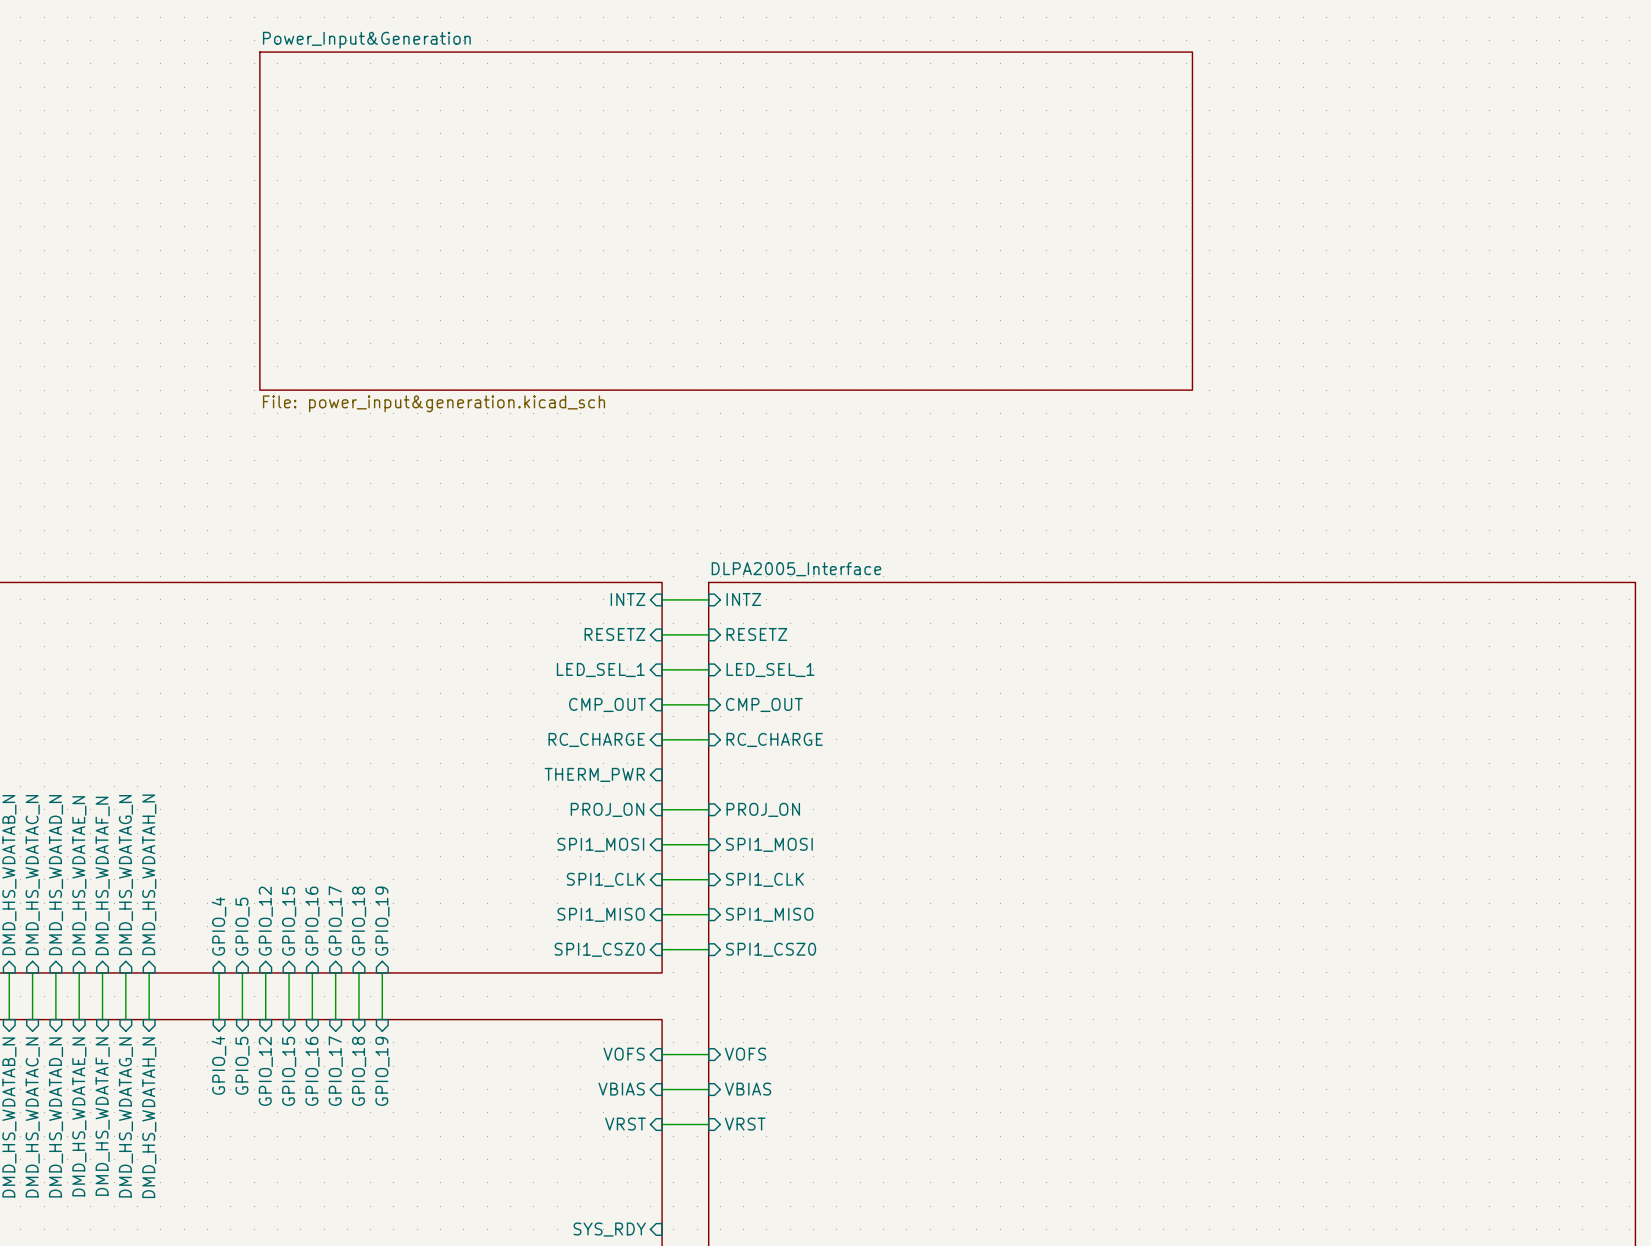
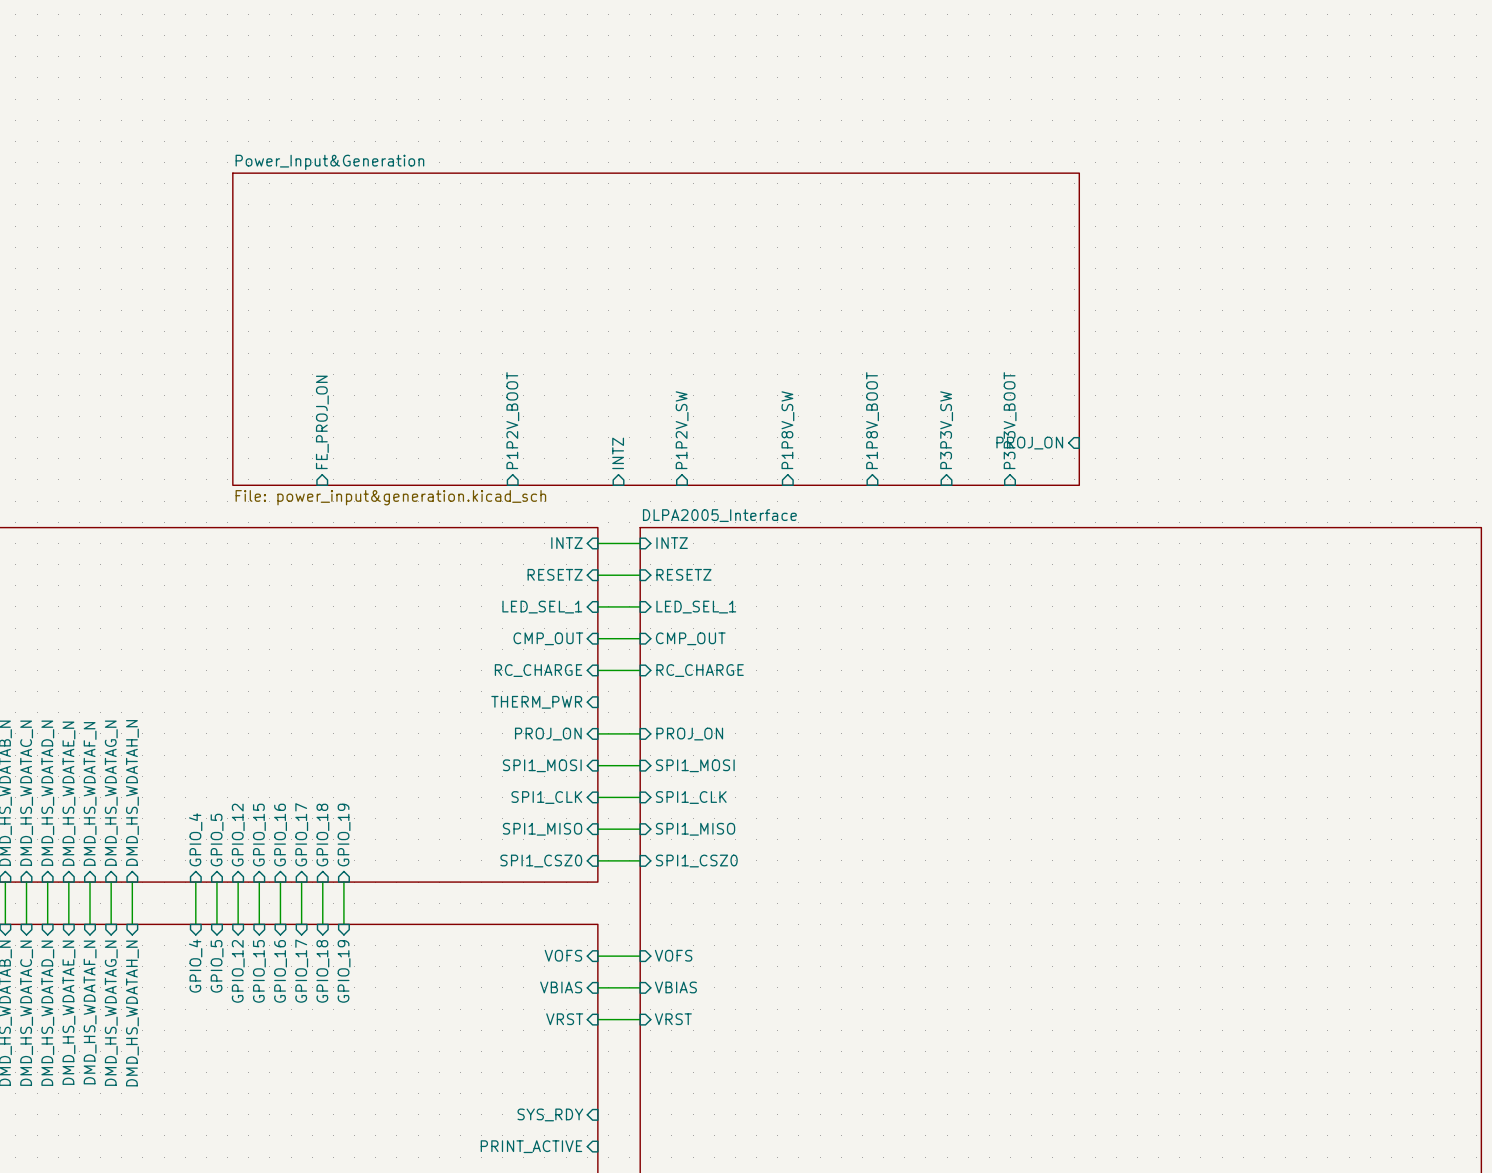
sheet Power_Input&Generation: File: power_input&generation.kicad_sch (726, 221) -> none
sheet Power_Input&Generation: none -> File: power_input&generation.kicad_sch (656, 329)
sheet pin: none -> P1P2V_BOOT (512, 420)
sheet pin: none -> P1P8V_BOOT (872, 420)
sheet pin: none -> P3P3V_BOOT (1010, 420)
sheet pin: none -> FE_PROJ_ON (322, 422)
sheet pin: none -> P1P2V_SW (682, 430)
sheet pin: none -> P1P8V_SW (787, 430)
sheet pin: none -> P3P3V_SW (946, 430)
sheet pin: none -> PROJ_ON (1029, 443)
sheet pin: none -> INTZ (618, 453)

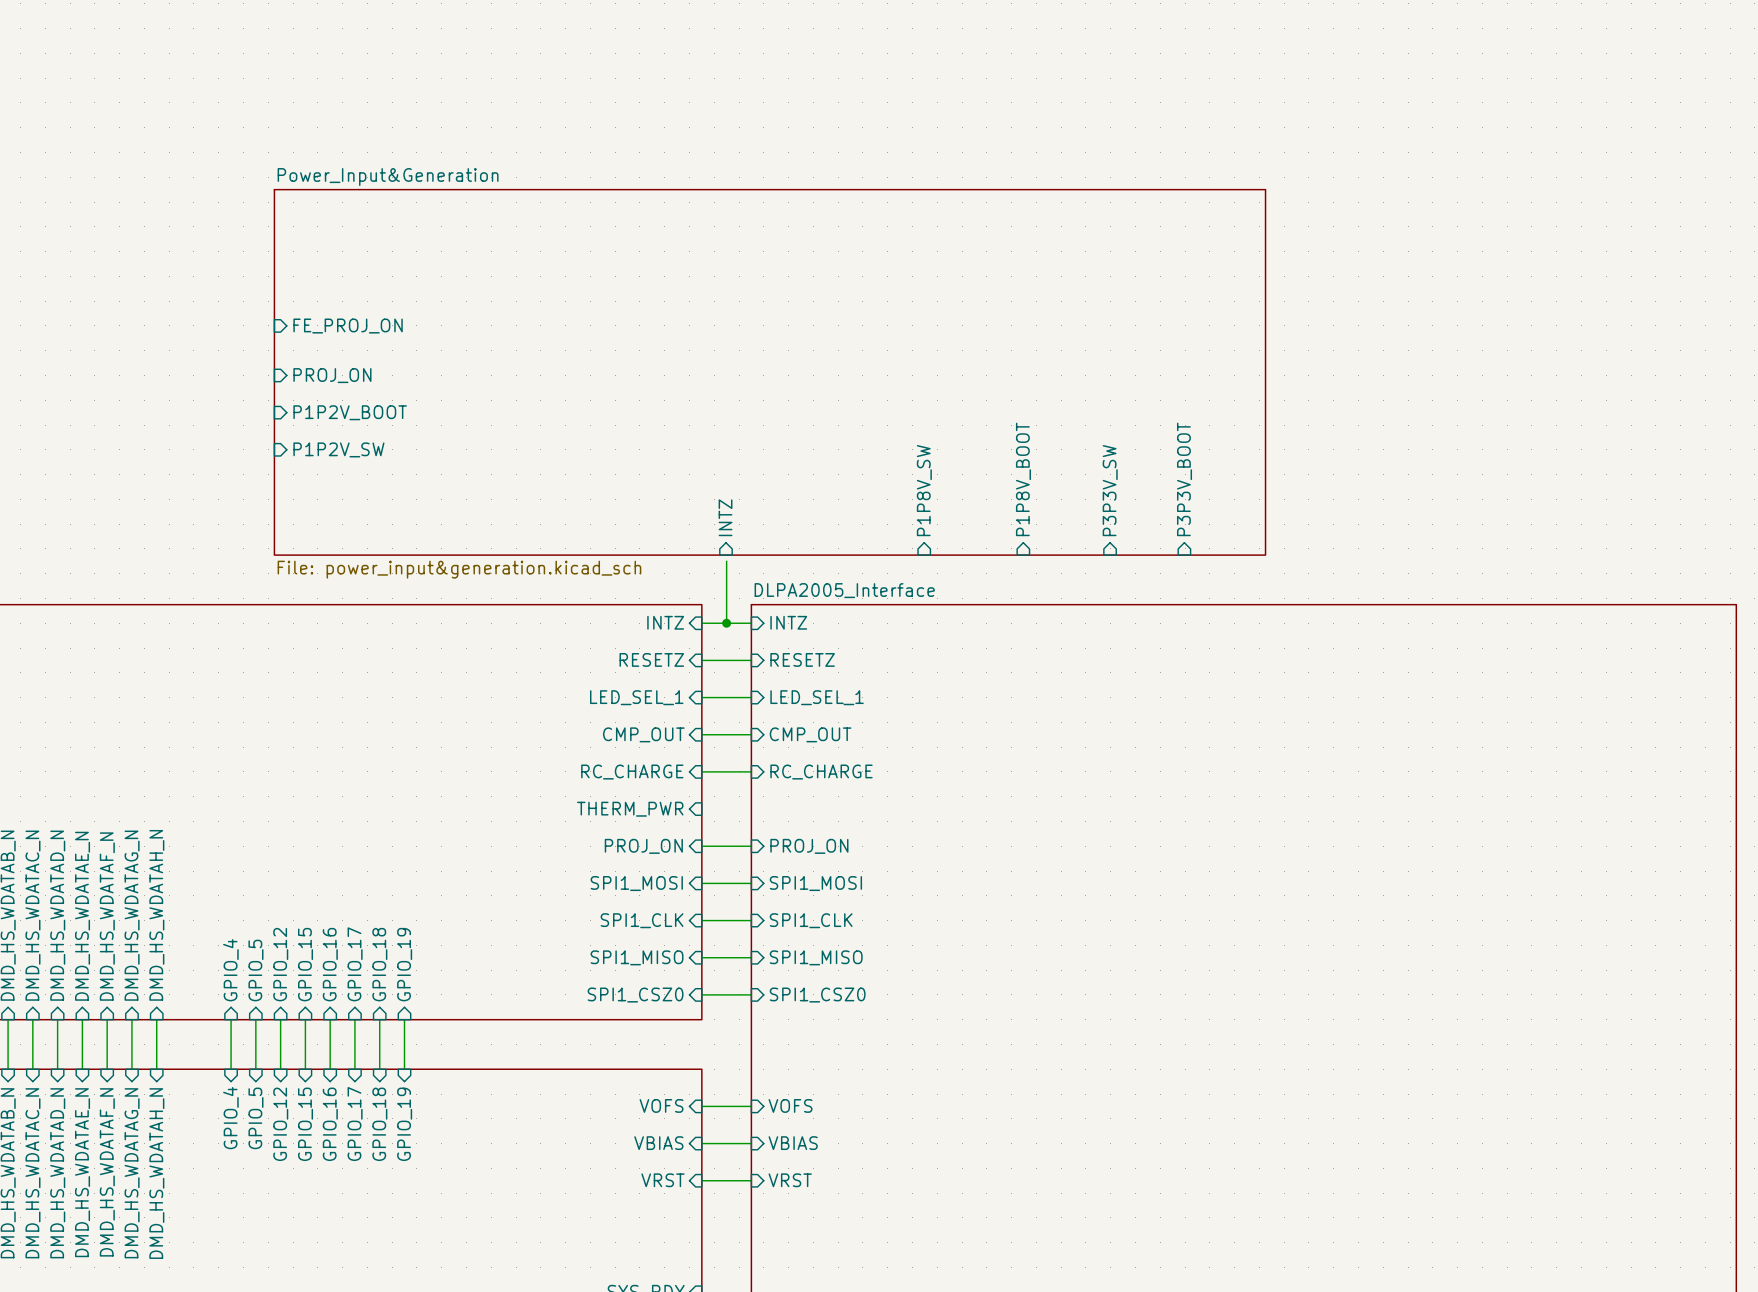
sheet pin: none -> PROJ_ON (332, 375)
sheet pin: none -> P1P2V_BOOT (350, 412)
sheet pin: none -> P1P2V_SW (338, 449)
sheet pin: P1P2V_BOOT (512, 420) -> none
sheet pin rotation: 0° (322, 422) -> 90° clockwise (348, 326)
sheet pin position: FE_PROJ_ON (322, 422) -> FE_PROJ_ON (348, 326)
sheet pin: P1P2V_SW (682, 430) -> none
sheet pin: PROJ_ON (1029, 443) -> none
wire: none -> (726, 561) (726, 623)
junction: none -> (726, 623)

